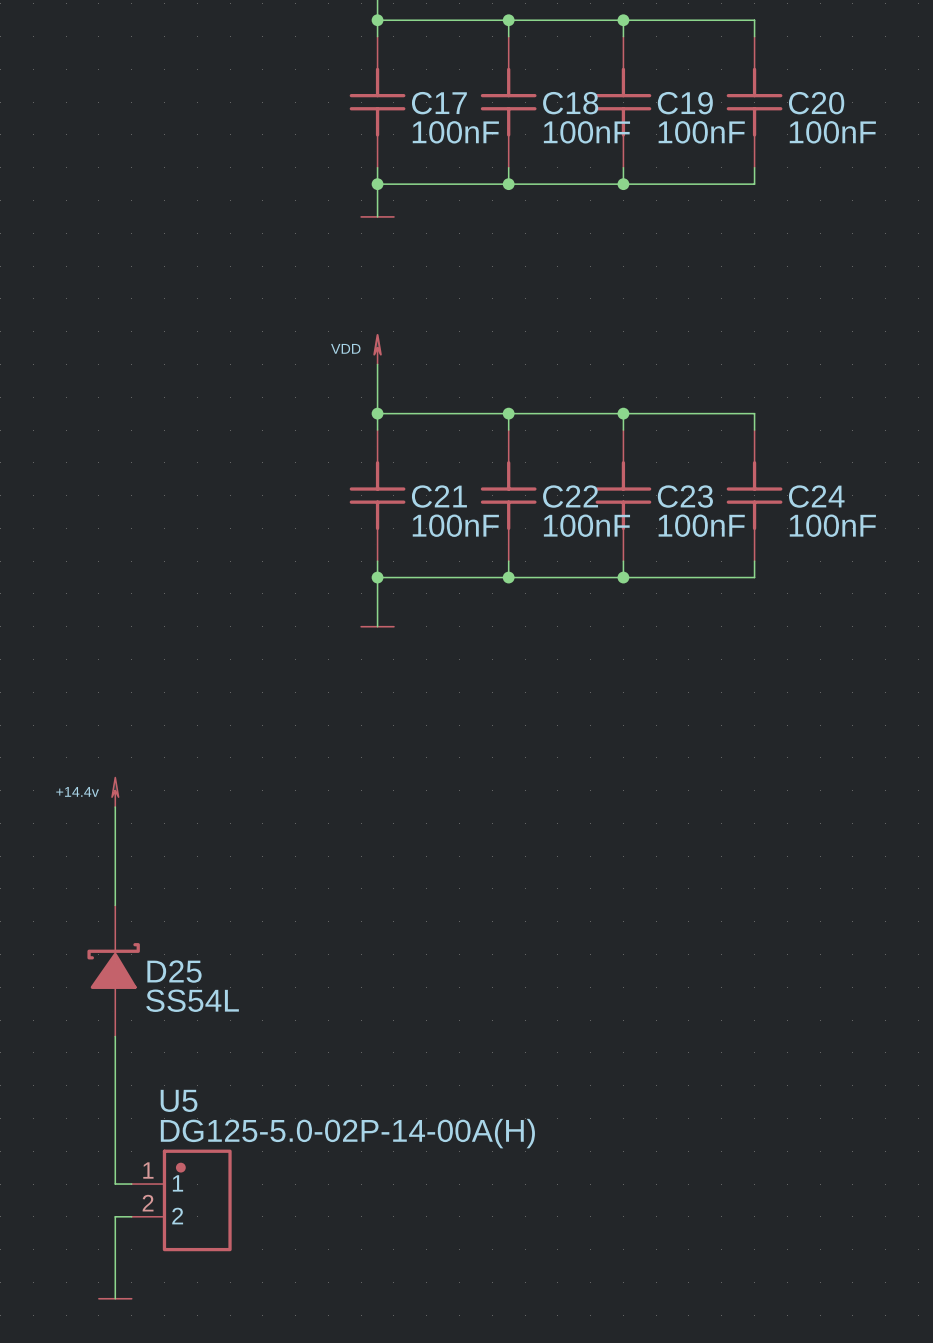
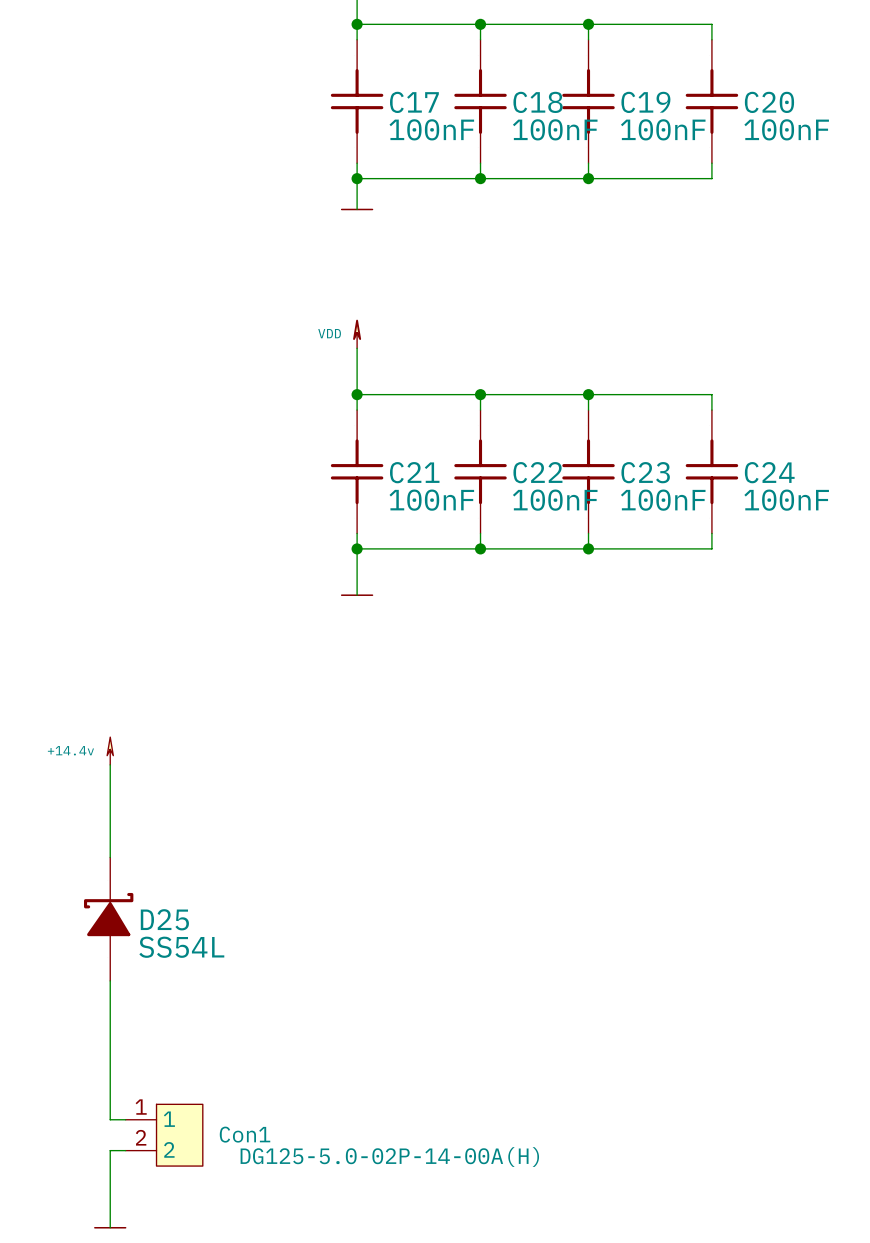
Con1: none -> DG125-5.0-02P-14-00A(H) (164, 1135)
U5: DG125-5.0-02P-14-00A(H) (181, 1200) -> none

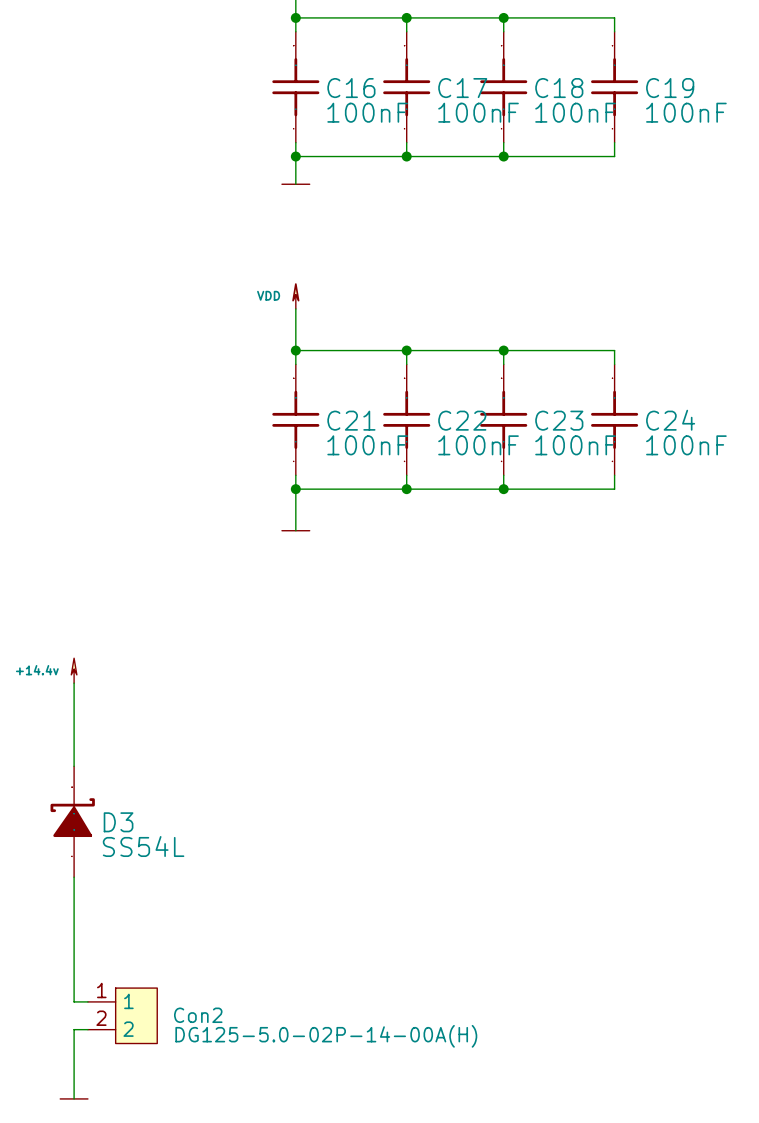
C17 name: C17 (414, 102) -> C16 (351, 88)
C18 name: C18 (538, 102) -> C17 (462, 88)
C19 name: C19 (645, 102) -> C18 (559, 88)
C20 name: C20 (769, 102) -> C19 (670, 88)
D25 name: D25 (164, 919) -> D3 (118, 822)
Con1 name: Con1 (245, 1134) -> Con2 (198, 1015)

